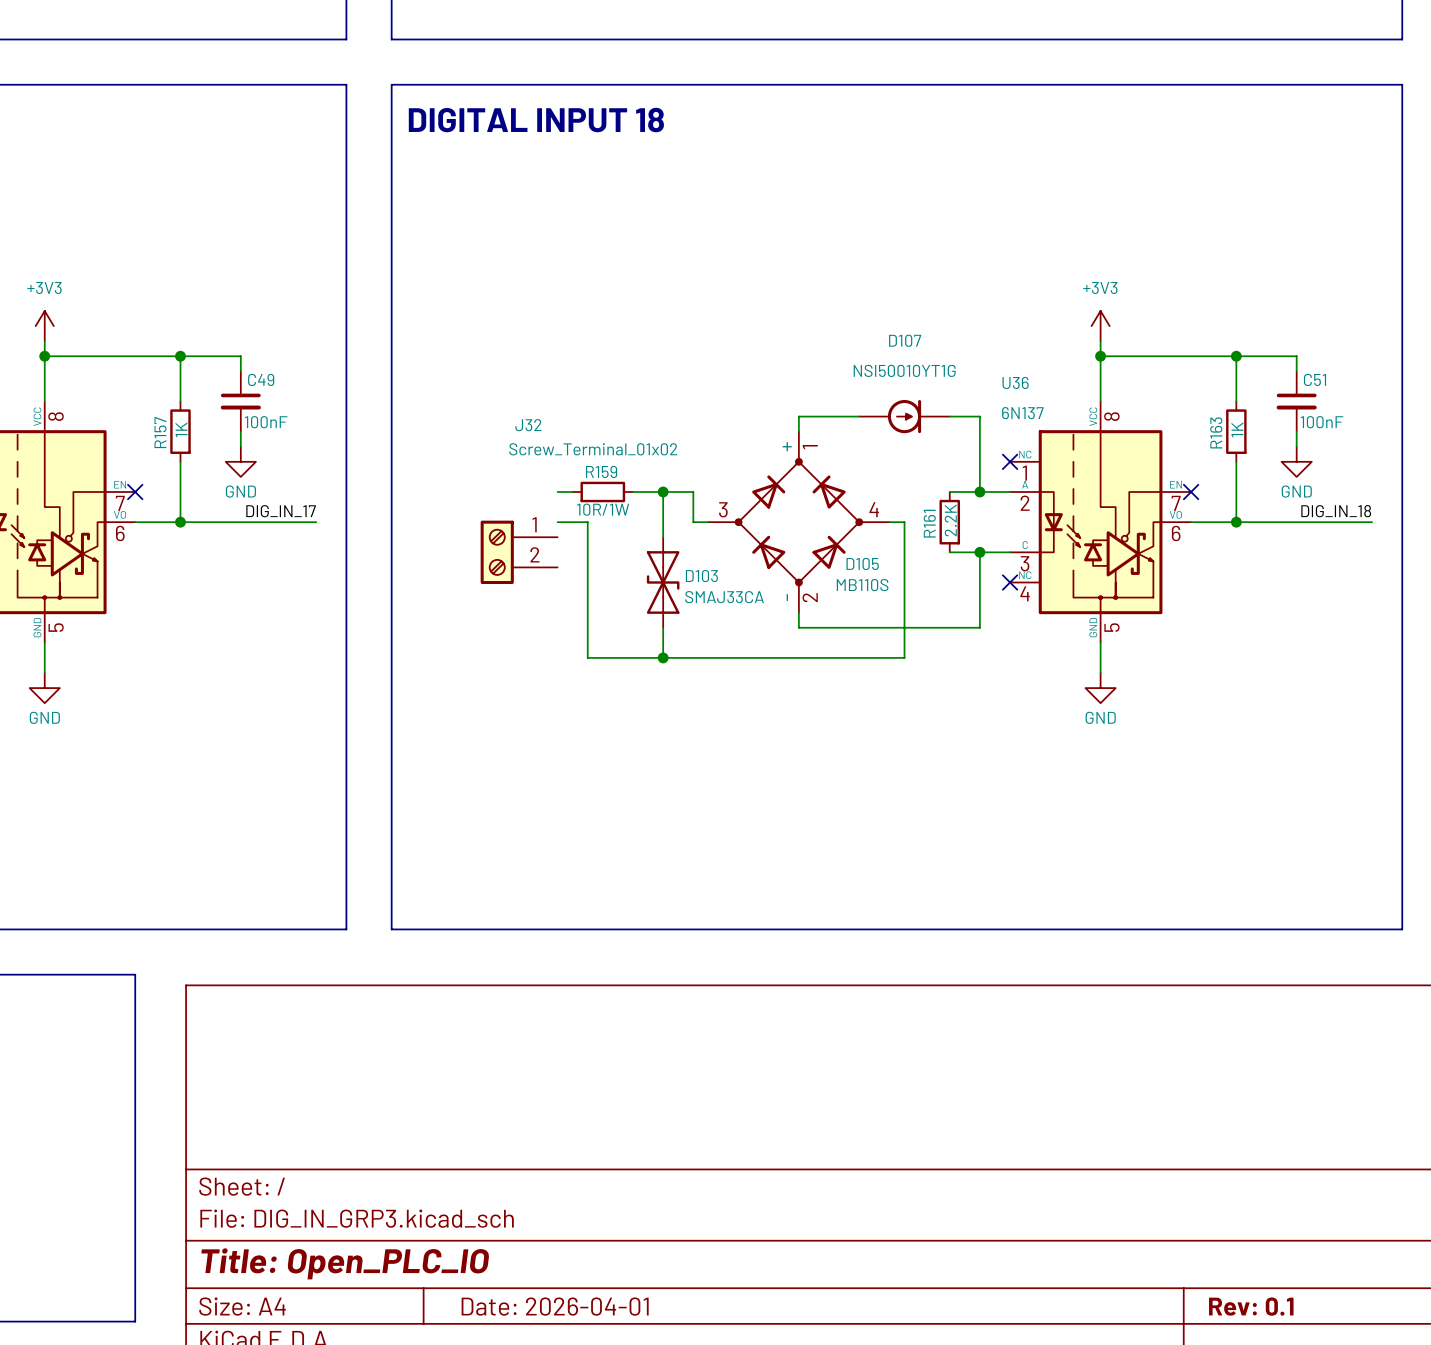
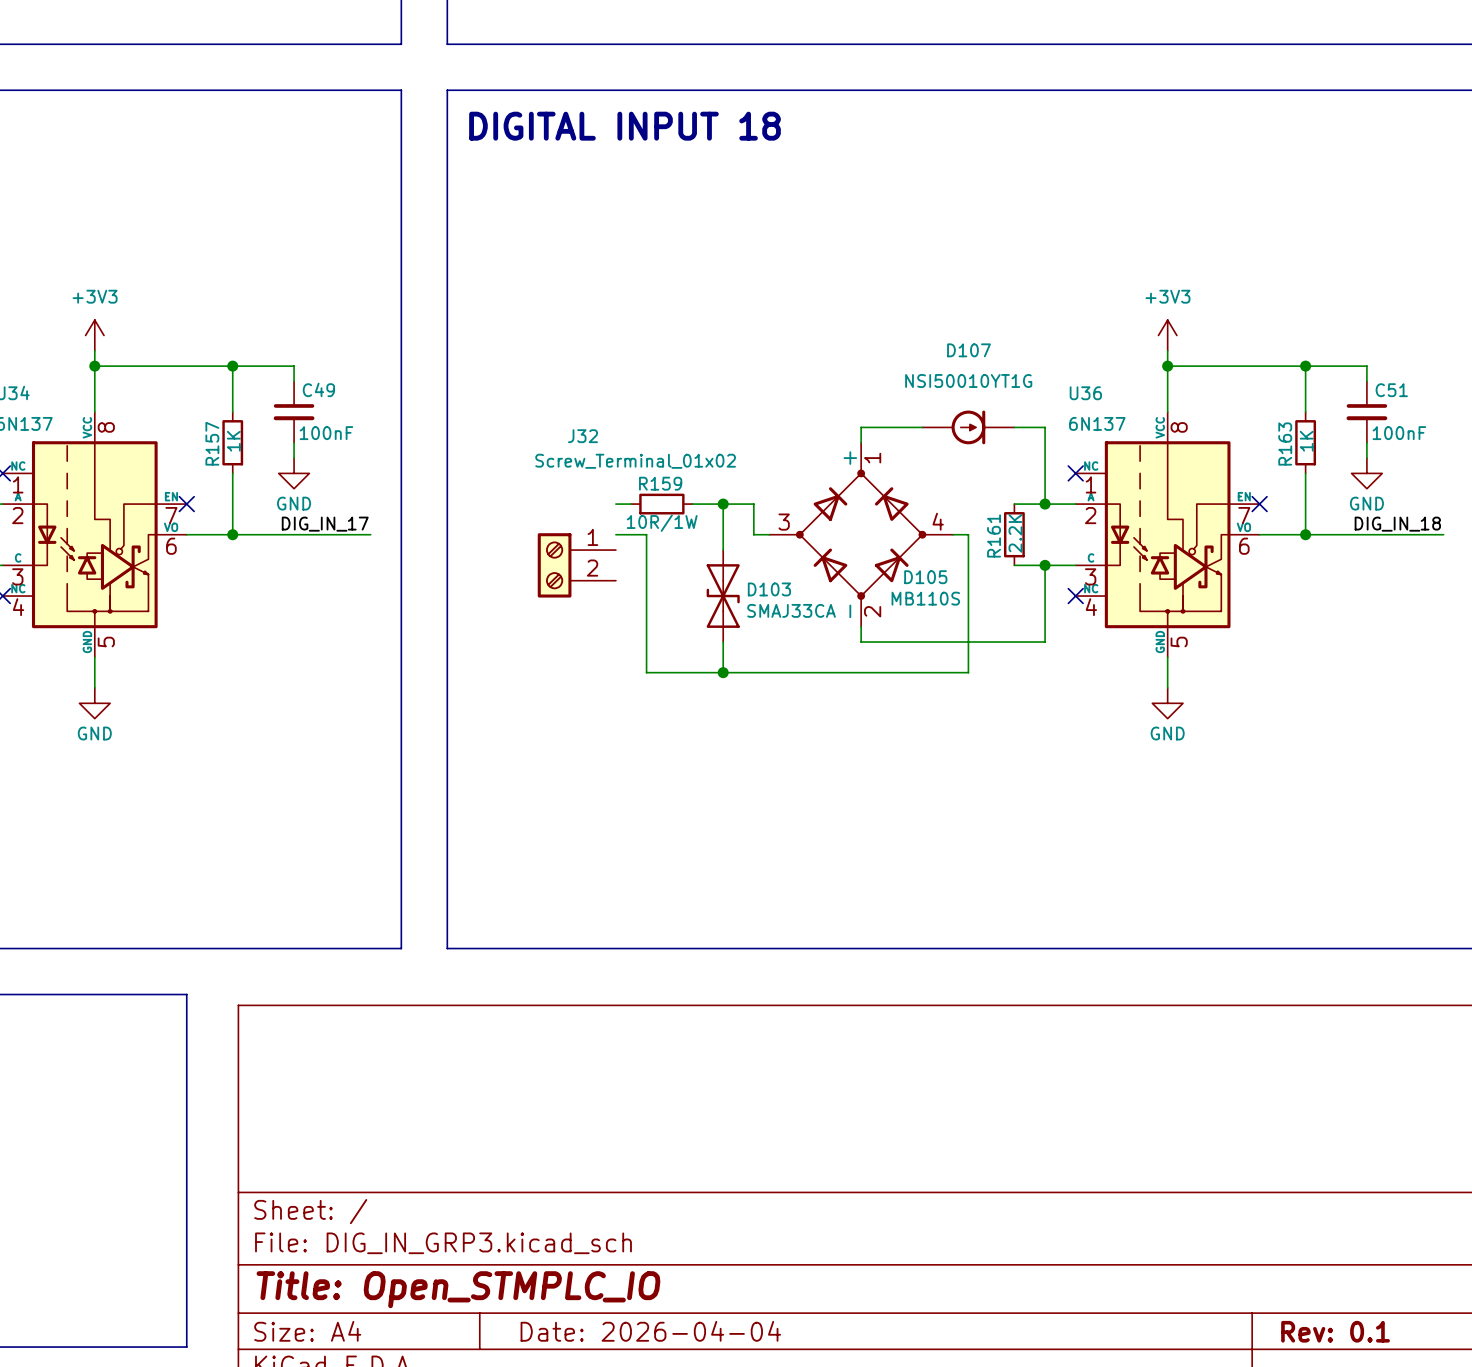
title block: Title: Open_PLC_IO (345, 1263) -> Title: Open_STMPLC_IO (458, 1289)
title block: Date: 2026-04-01 (555, 1306) -> Date: 2026-04-04 (650, 1331)

